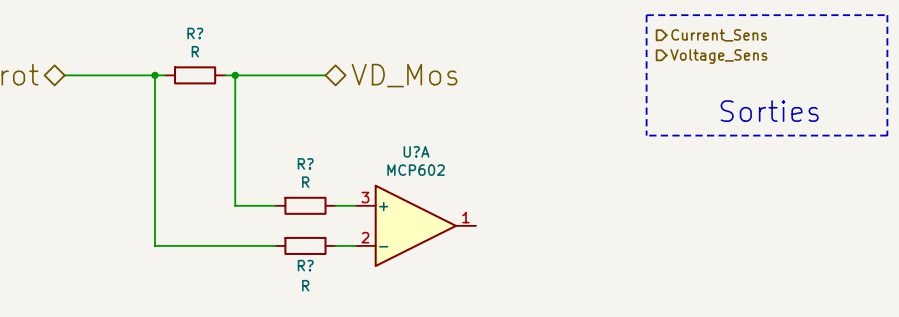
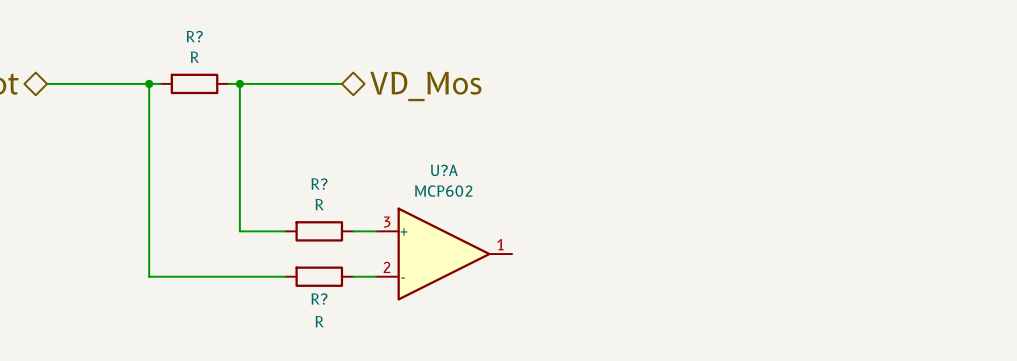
line: (646, 15) (887, 15) (887, 135) (646, 135) (646, 15) -> none
hierarchical label: Current_Sens (719, 35) -> none
hierarchical label: Voltage_Sens (718, 56) -> none
text: Sorties (769, 111) -> none

